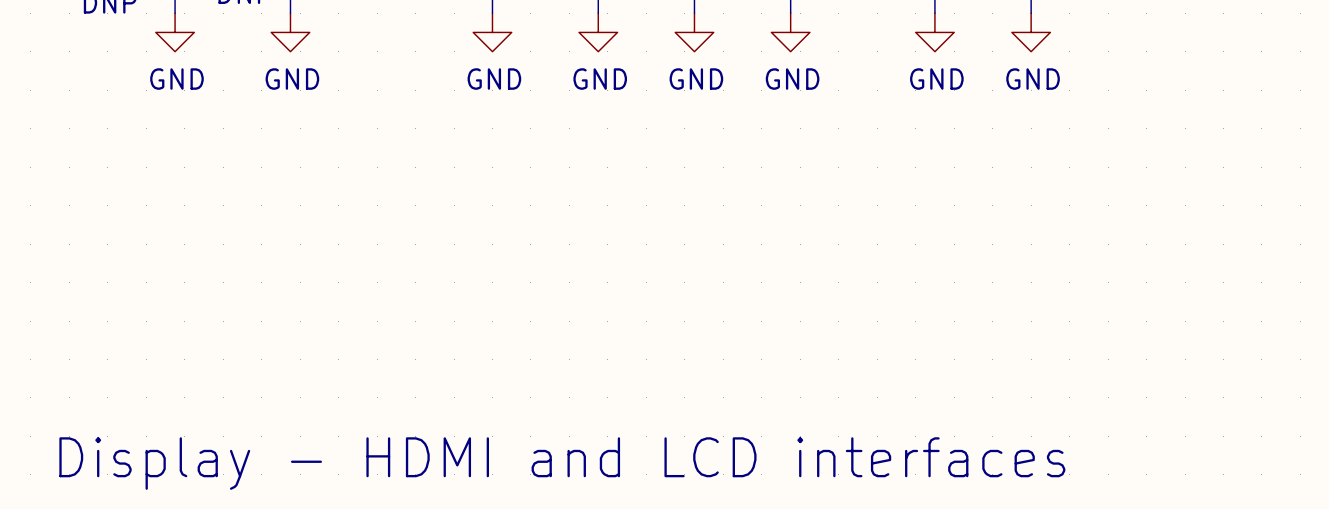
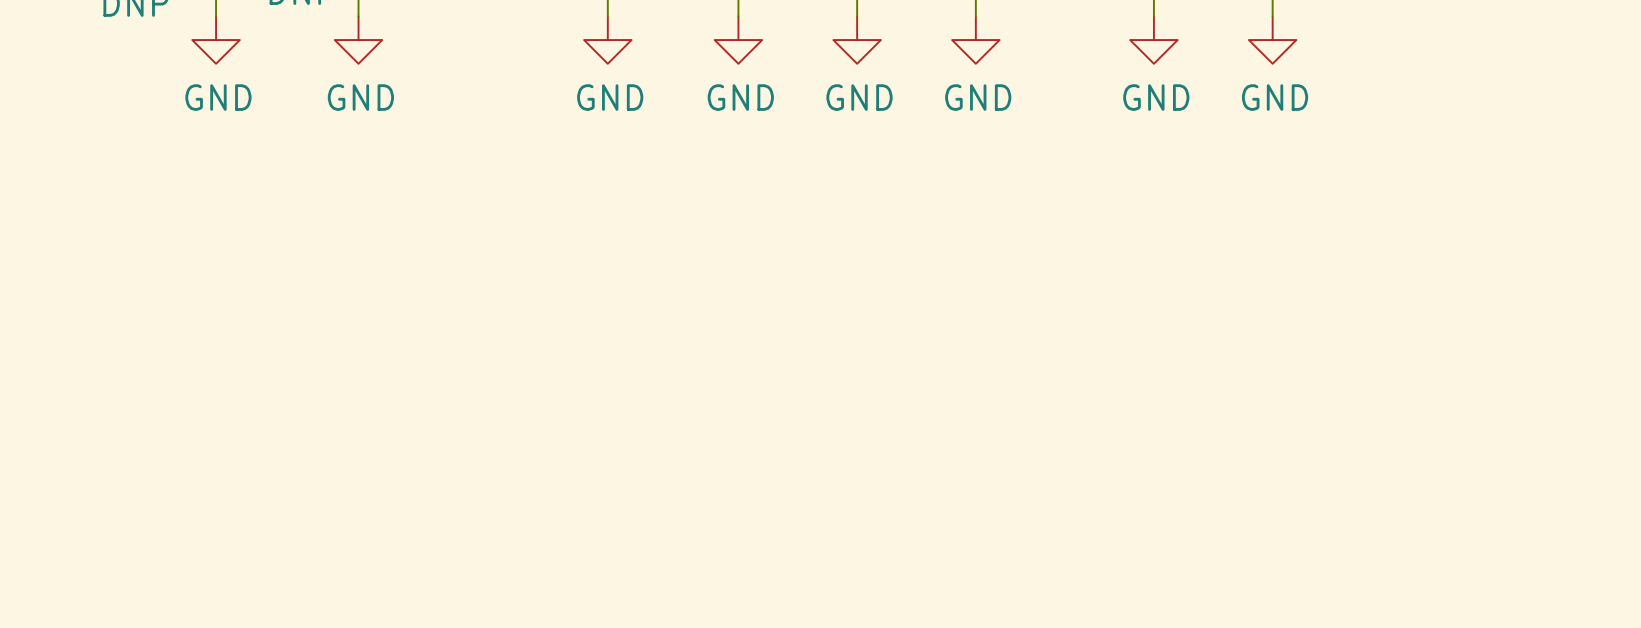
text: Display - HDMI and LCD interfaces (562, 463) -> none

